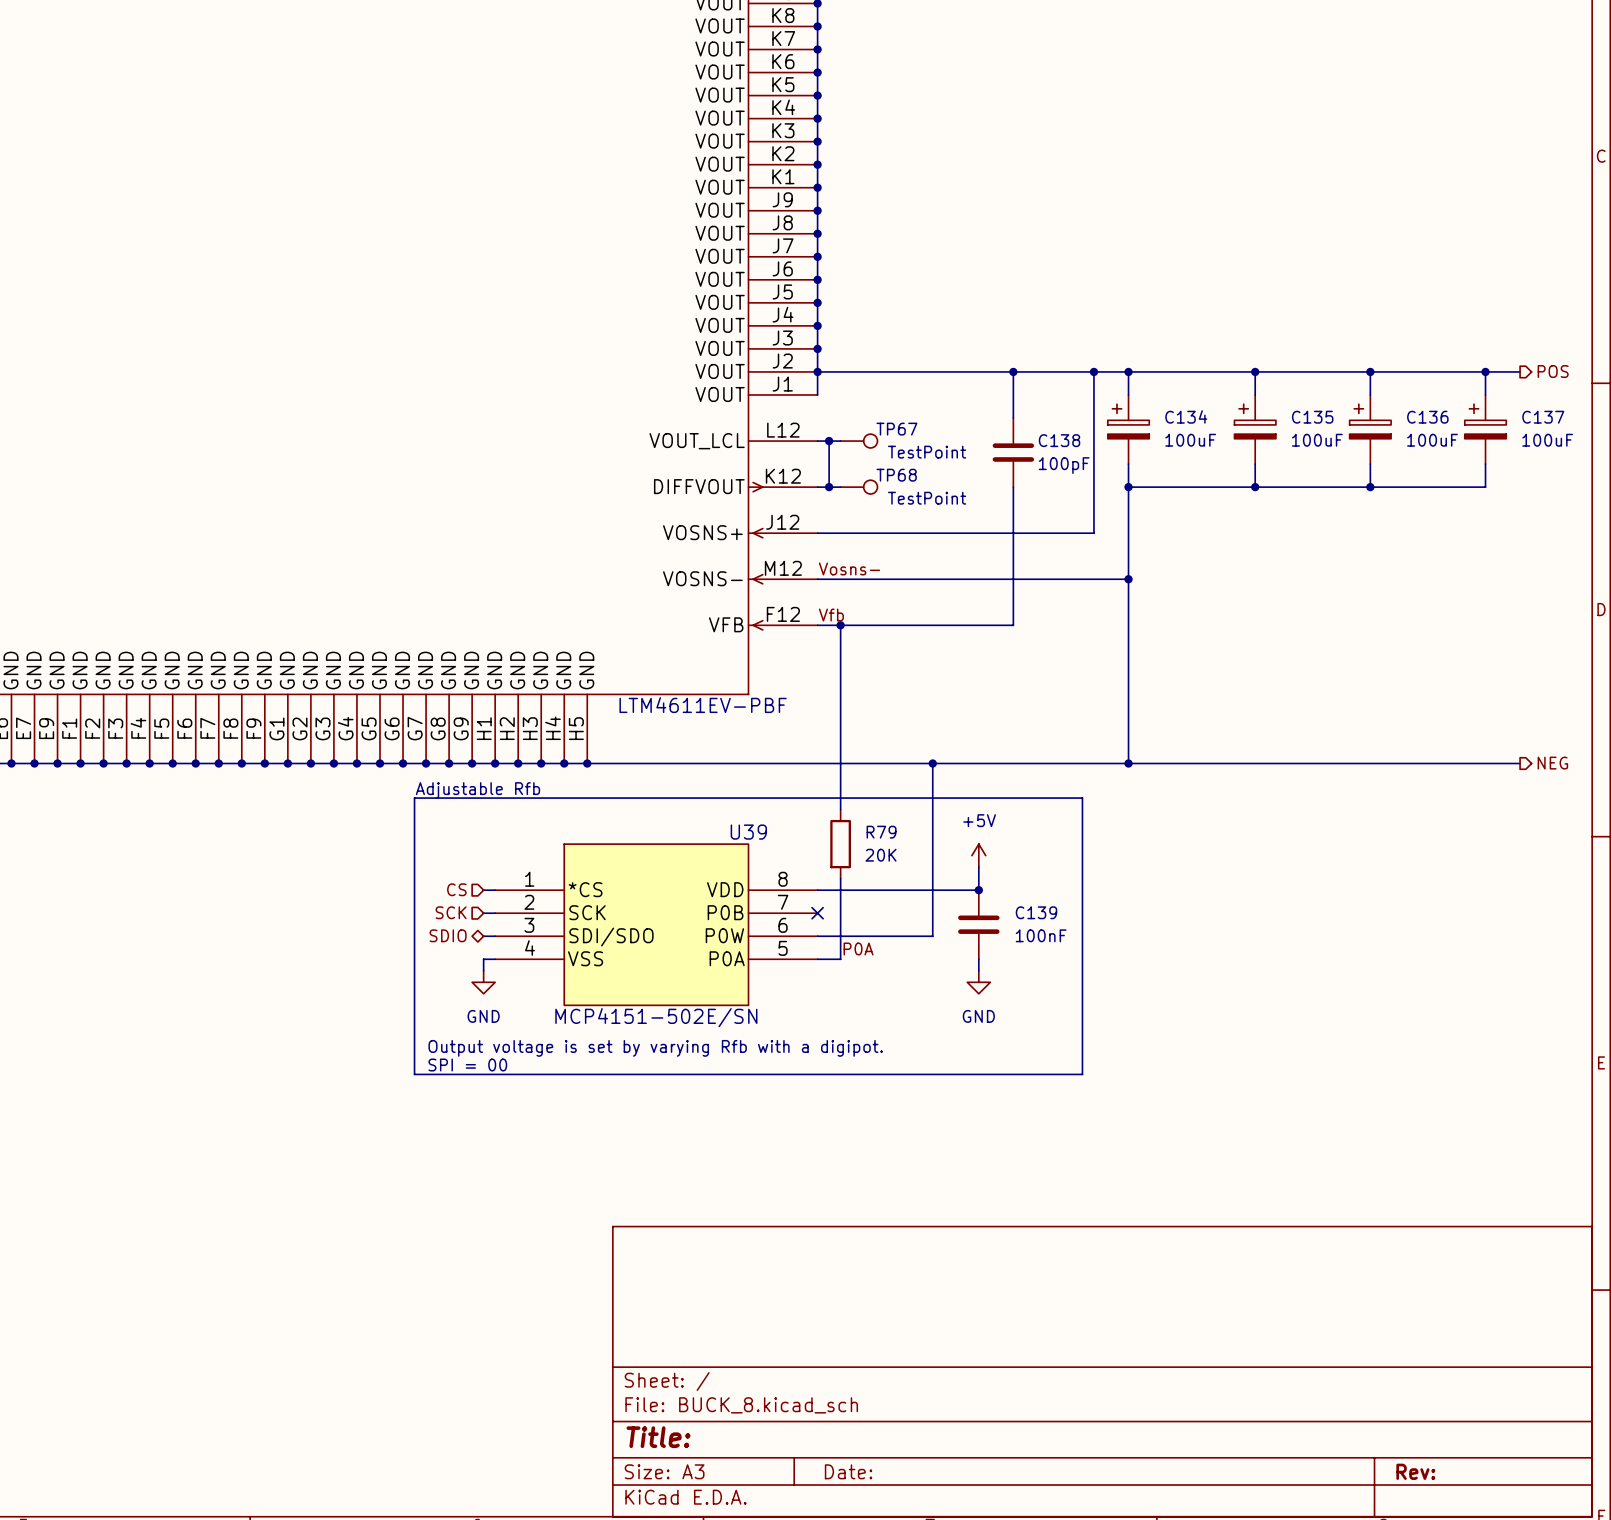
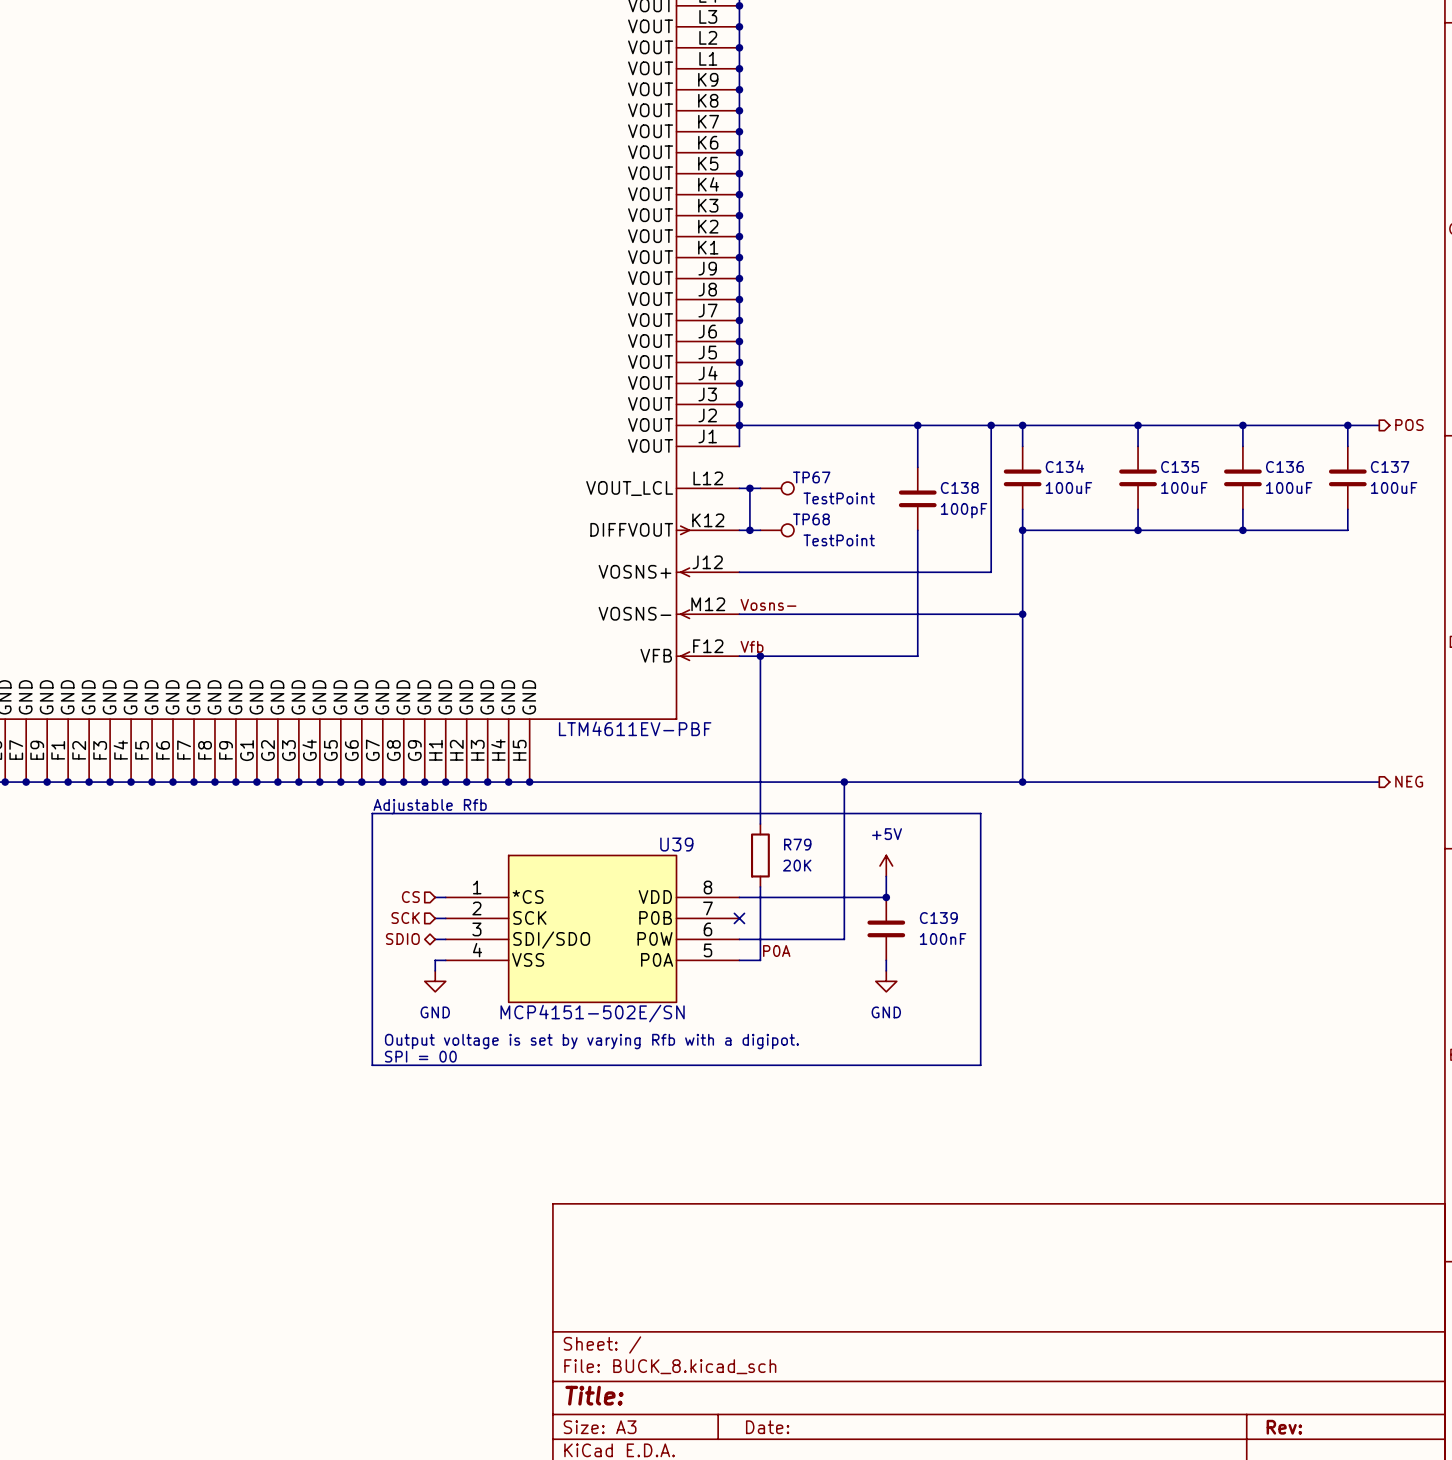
C134 symbol: [1107, 394, 1150, 465] -> [1003, 446, 1042, 510]
C135 symbol: [1234, 394, 1276, 465] -> [1119, 446, 1157, 510]
C136 symbol: [1349, 394, 1392, 465] -> [1224, 446, 1262, 510]
C137 symbol: [1464, 394, 1507, 465] -> [1328, 446, 1367, 510]

